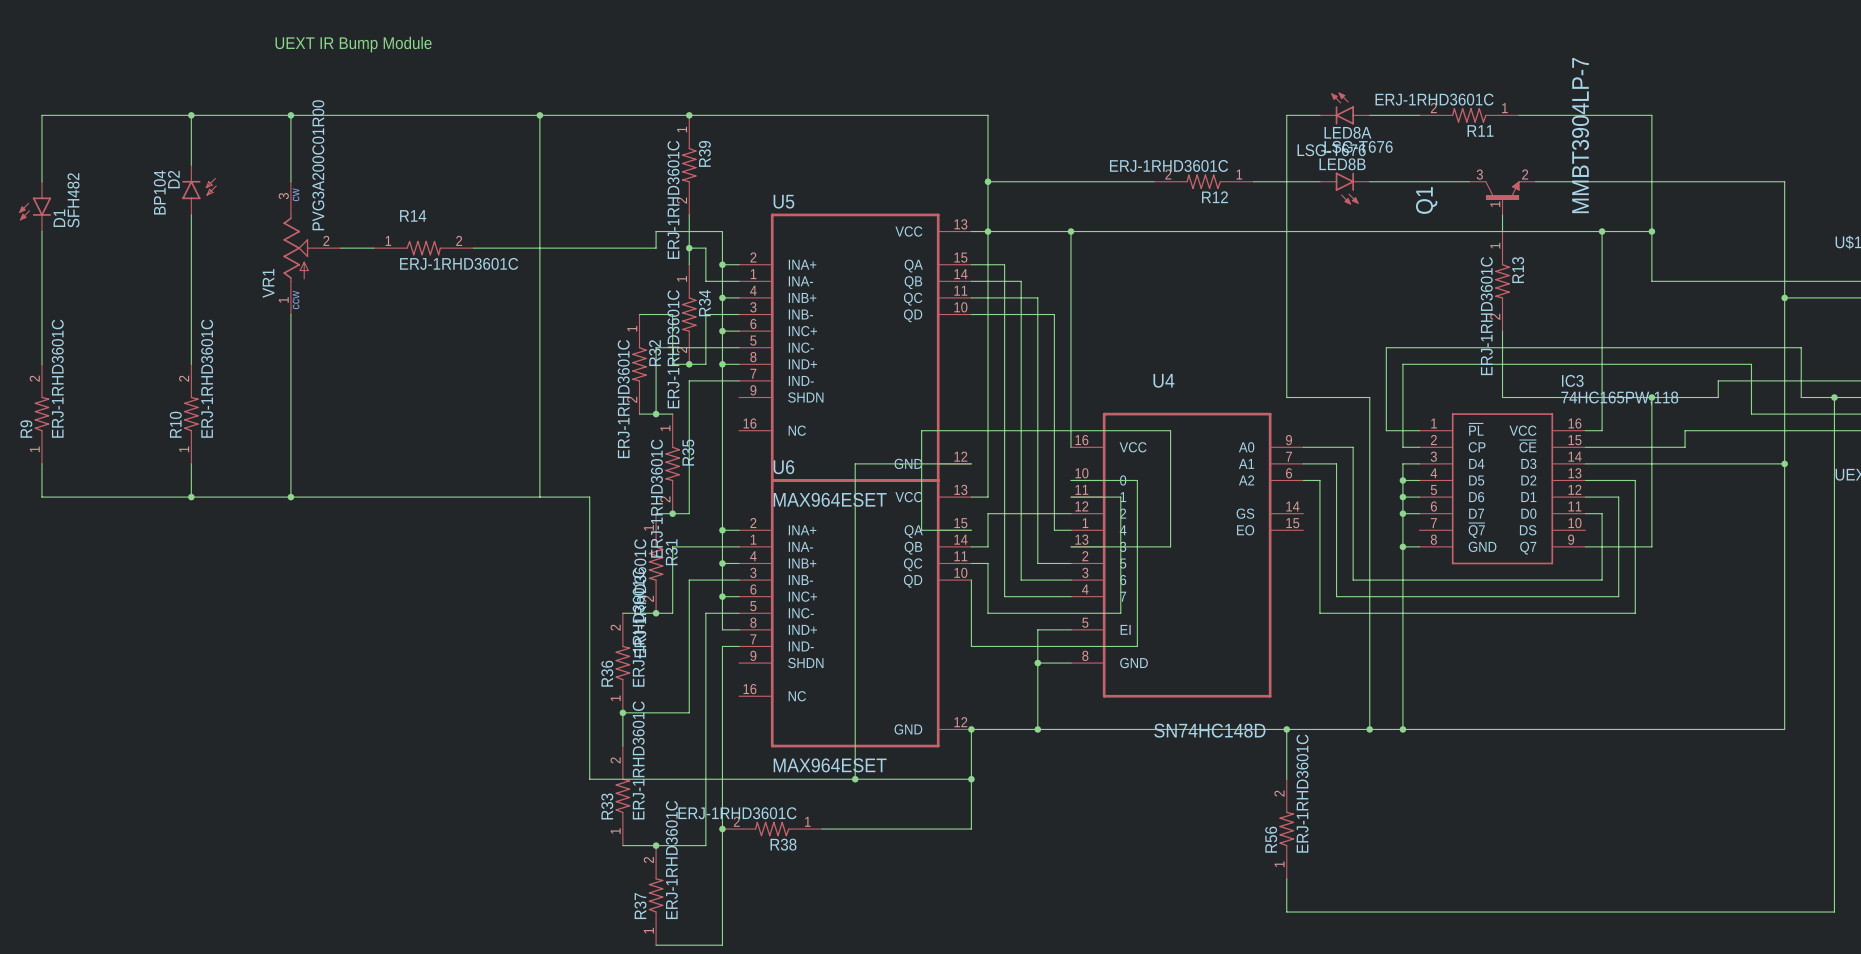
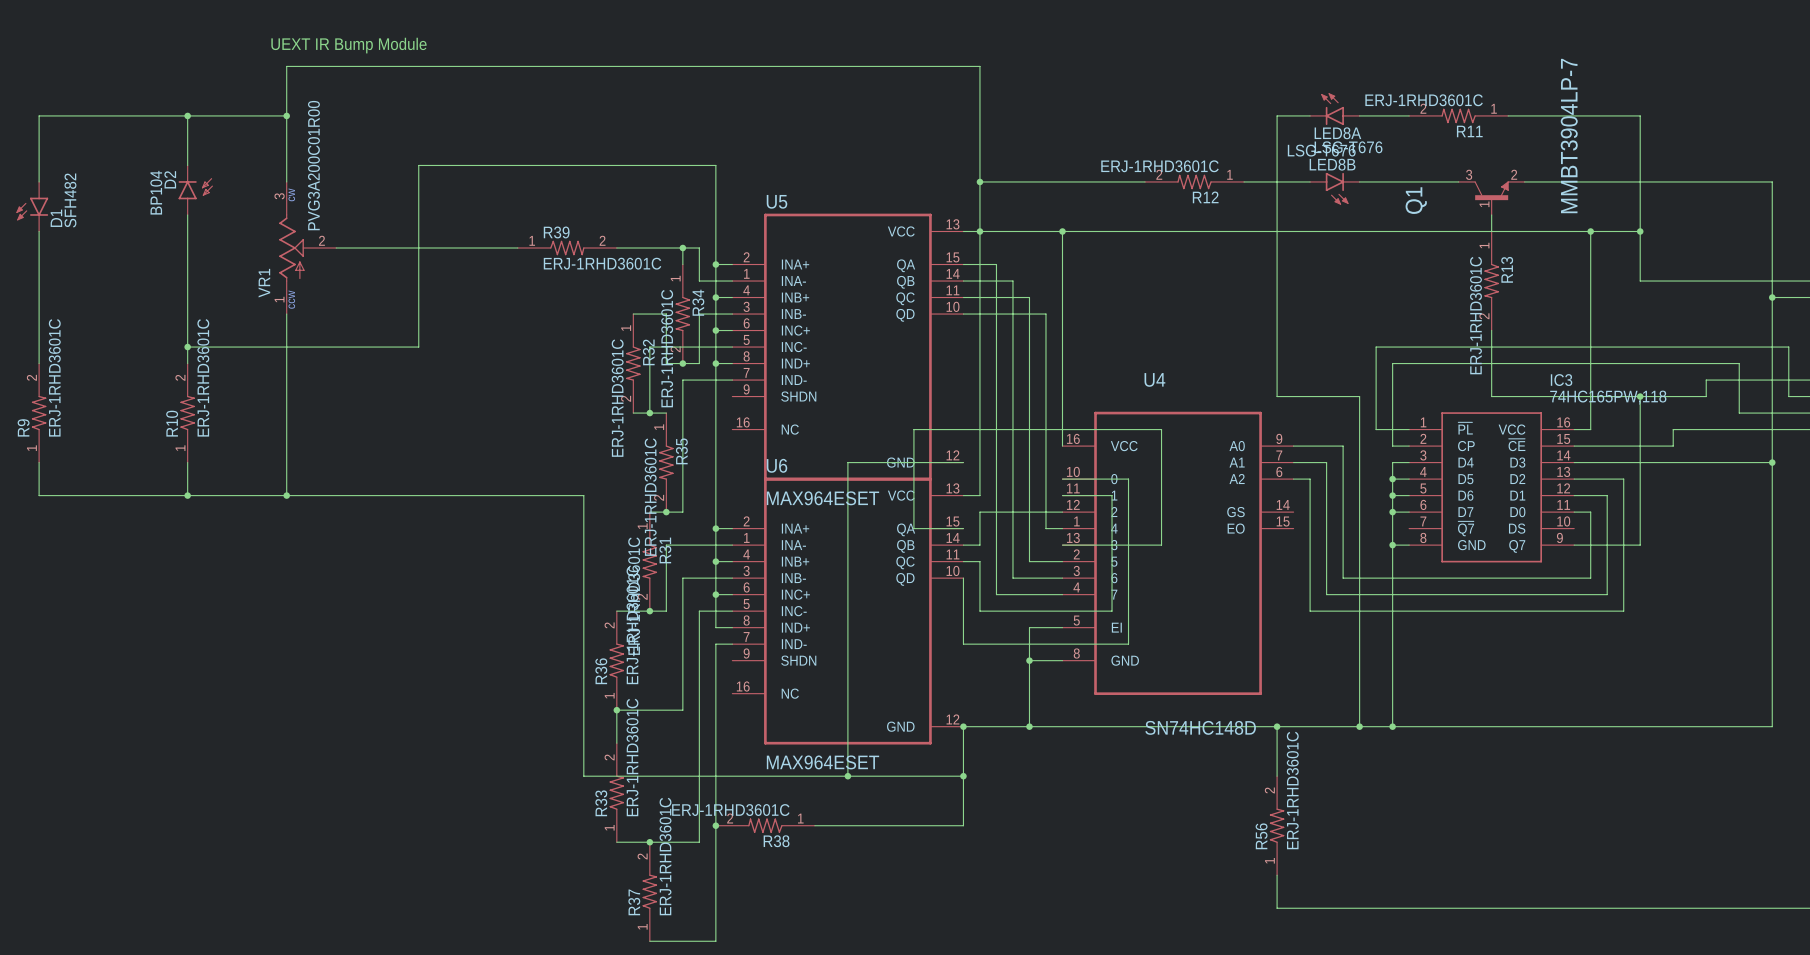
wire: (290, 115) (988, 115) -> (286, 115) (286, 66) (979, 66) (979, 115)
wire: (539, 115) (539, 497) -> none
junction: (539, 115) -> none
junction: (689, 115) -> none
R39 rotation: 0° (689, 165) -> 90° counterclockwise (567, 248)
R39 position: (689, 165) -> (567, 248)
wire: (689, 214) (689, 248) -> none
wire: (722, 231) (656, 231) (656, 248) -> (682, 248) (649, 248)
wire: none -> (715, 231) (715, 165) (418, 165) (418, 347) (187, 347)
R14: ERJ-1RHD3601C (423, 248) -> none
junction: none -> (187, 347)

